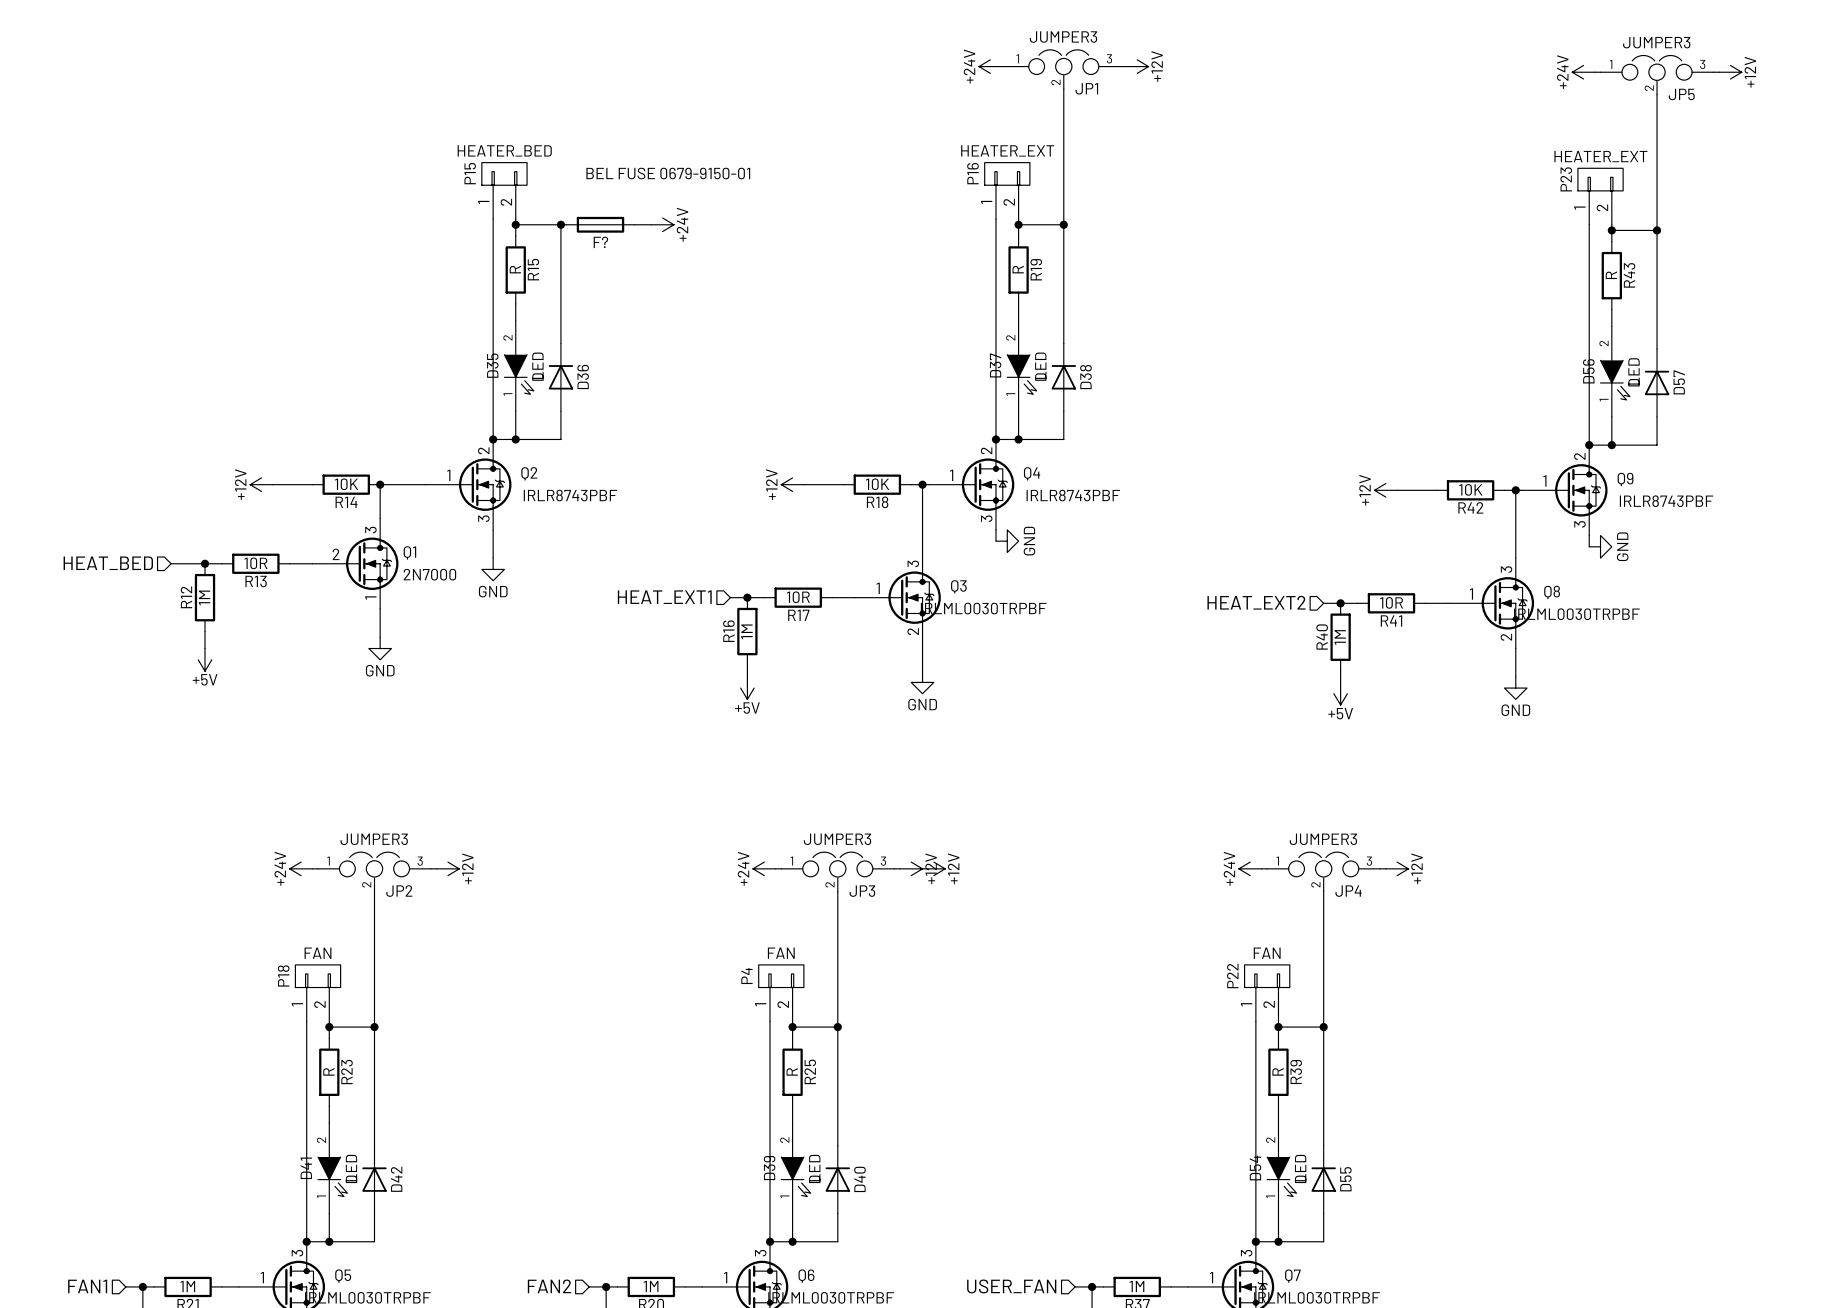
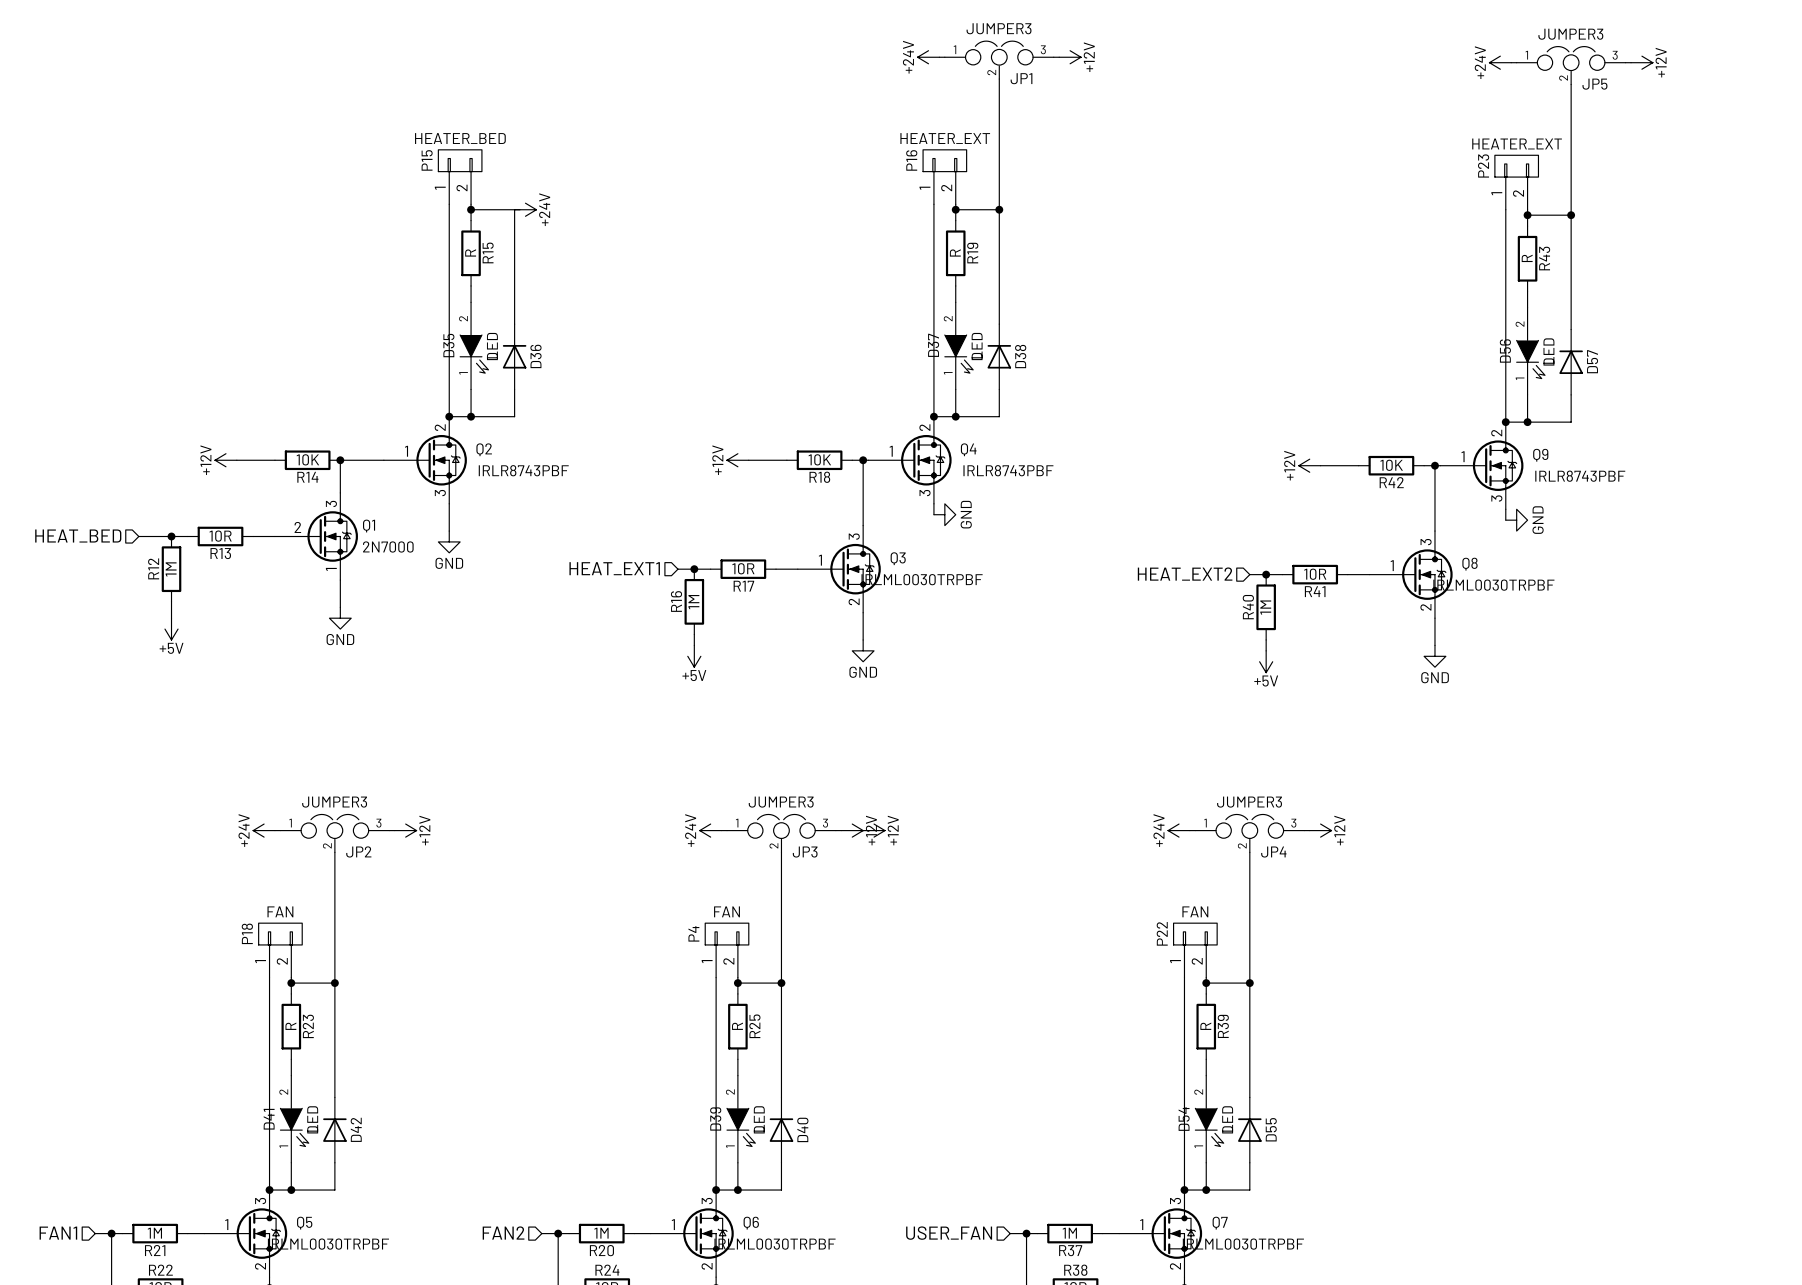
junction: (560, 224) -> none
F?: BEL FUSE 0679-9150-01 (600, 224) -> none
wire: (634, 224) (651, 224) -> none
power symbol position: +24V (662, 224) -> +24V (525, 209)

